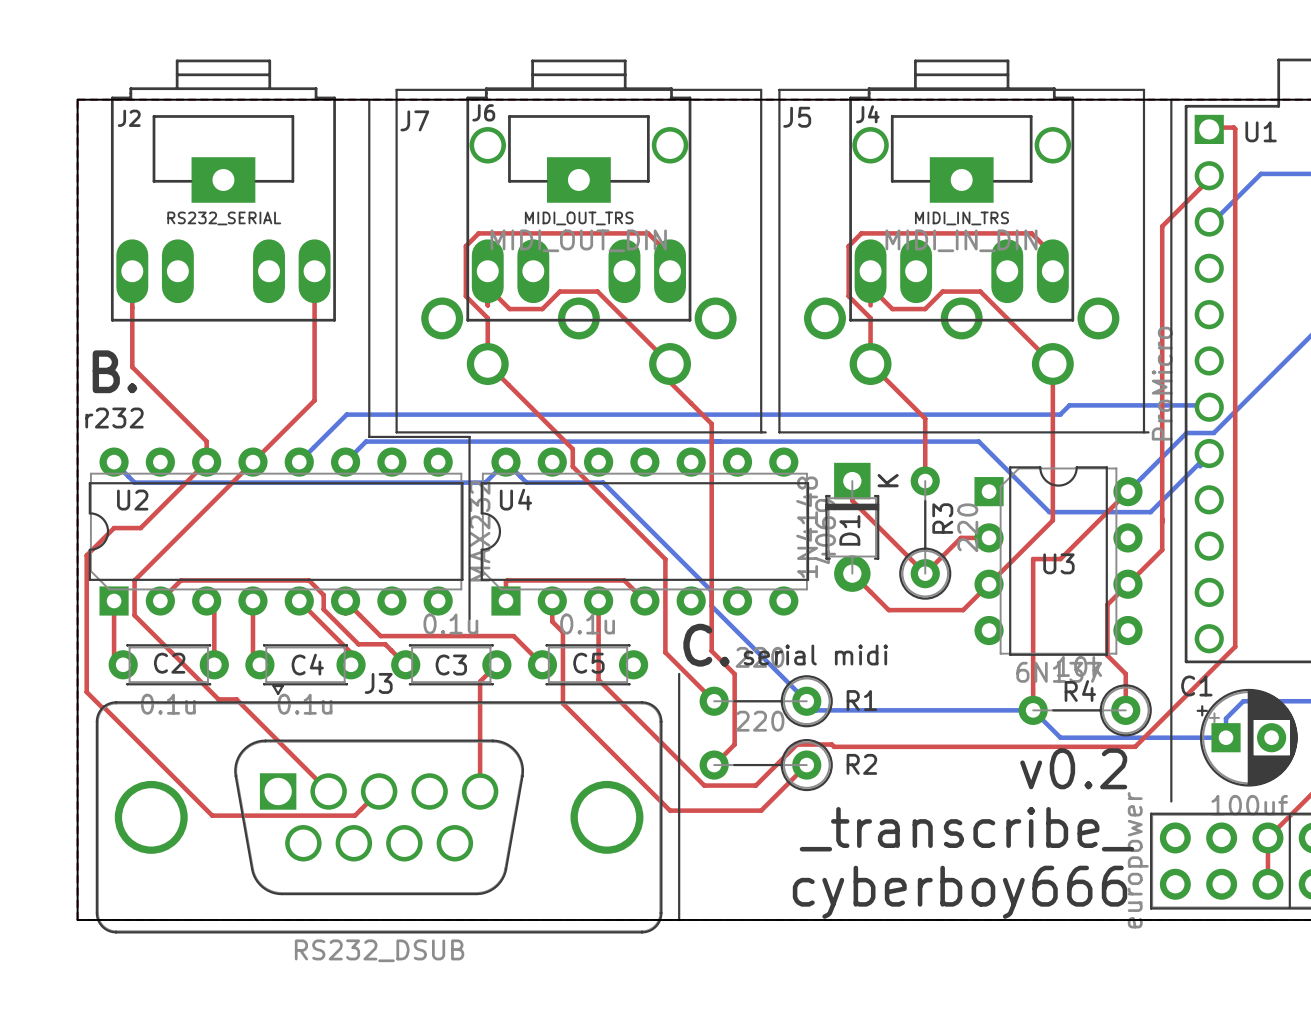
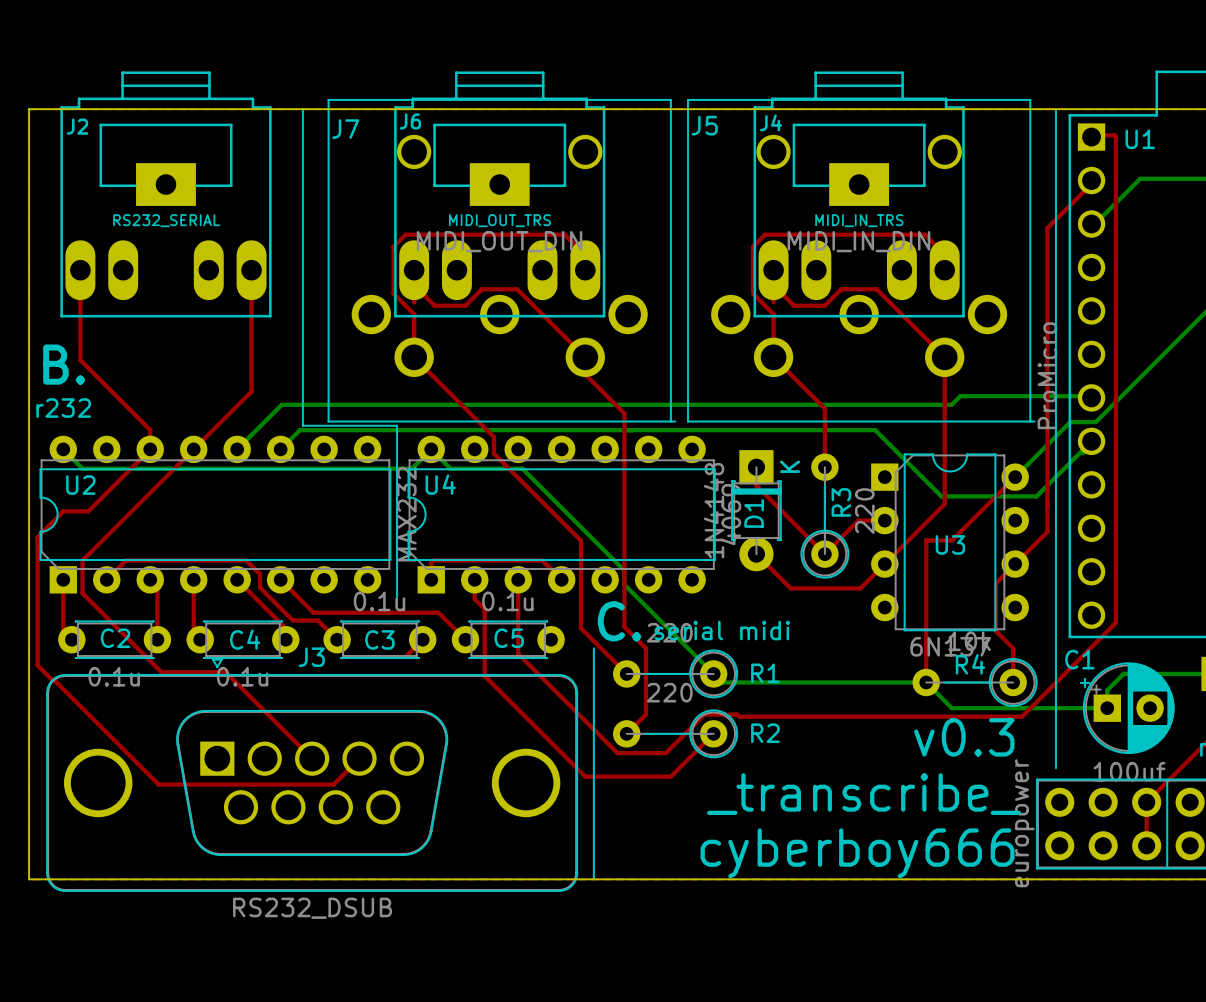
top track: (480, 681) (480, 791) -> none
top track: (236, 699) (328, 791) -> (178, 672) (225, 672) (312, 758)
text: v0.2 (1073, 768) -> v0.3 (964, 737)
top track: (379, 791) (354, 815) (212, 815) -> (359, 758) (333, 784) (158, 784) (155, 781)

